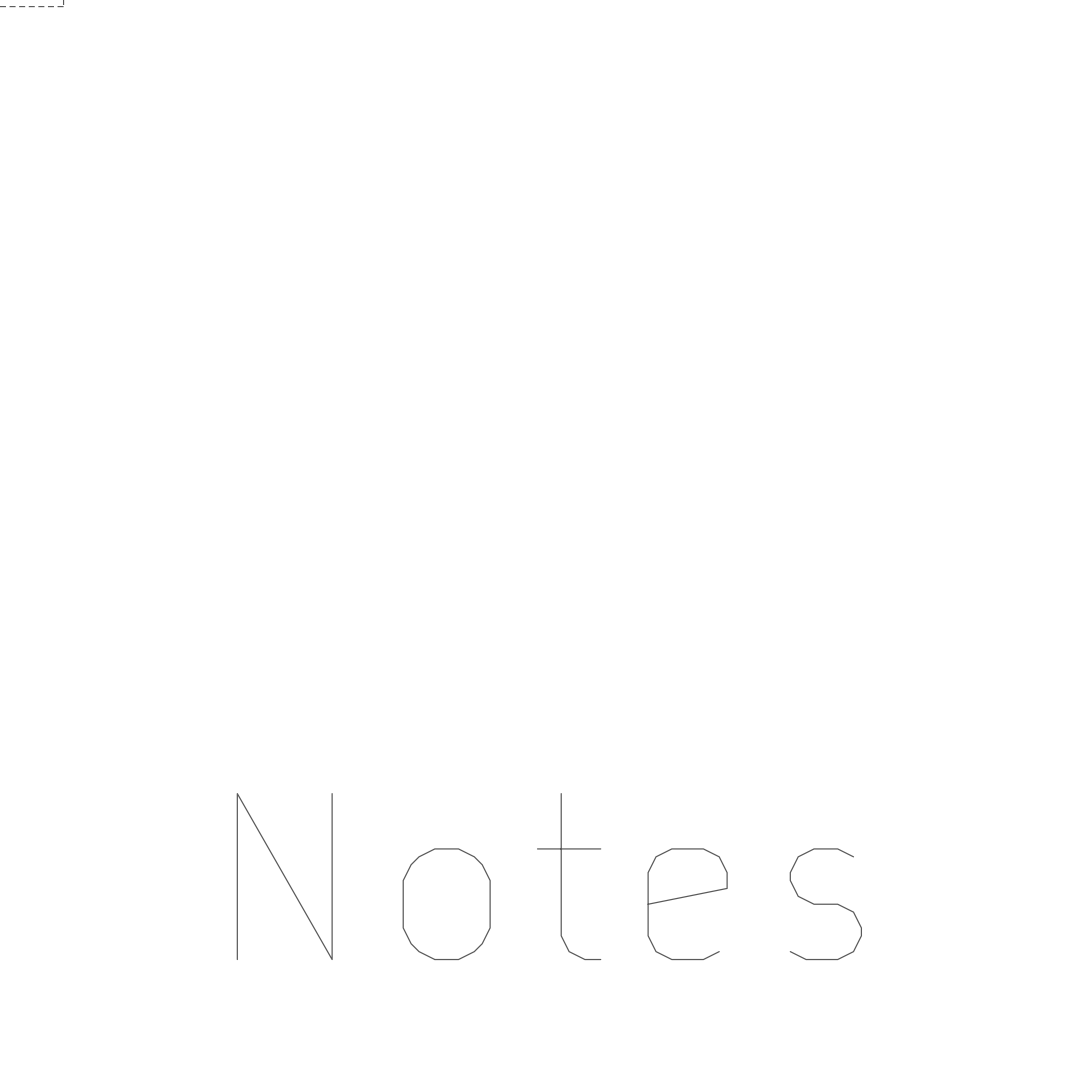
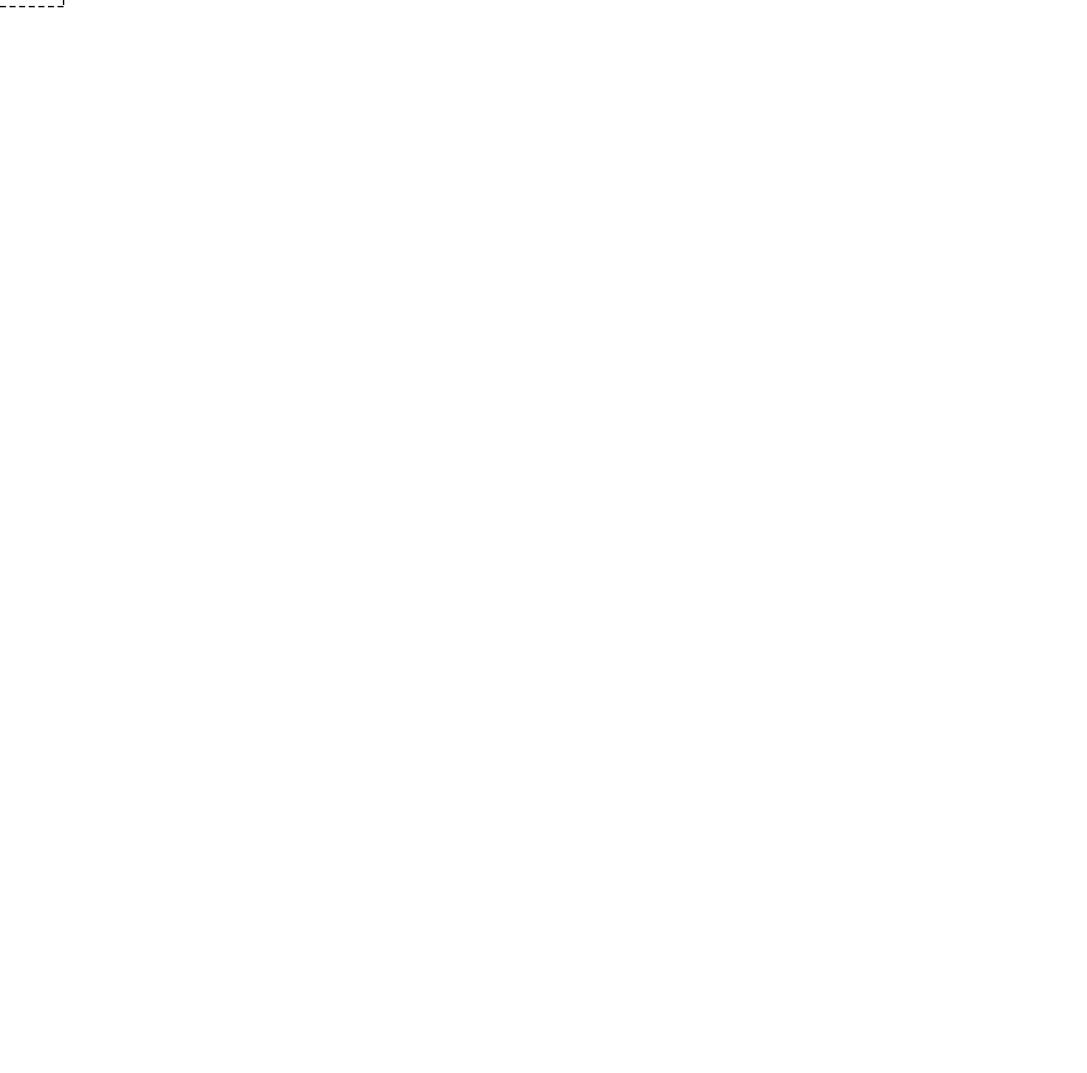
text: Notes (549, 876) -> none

